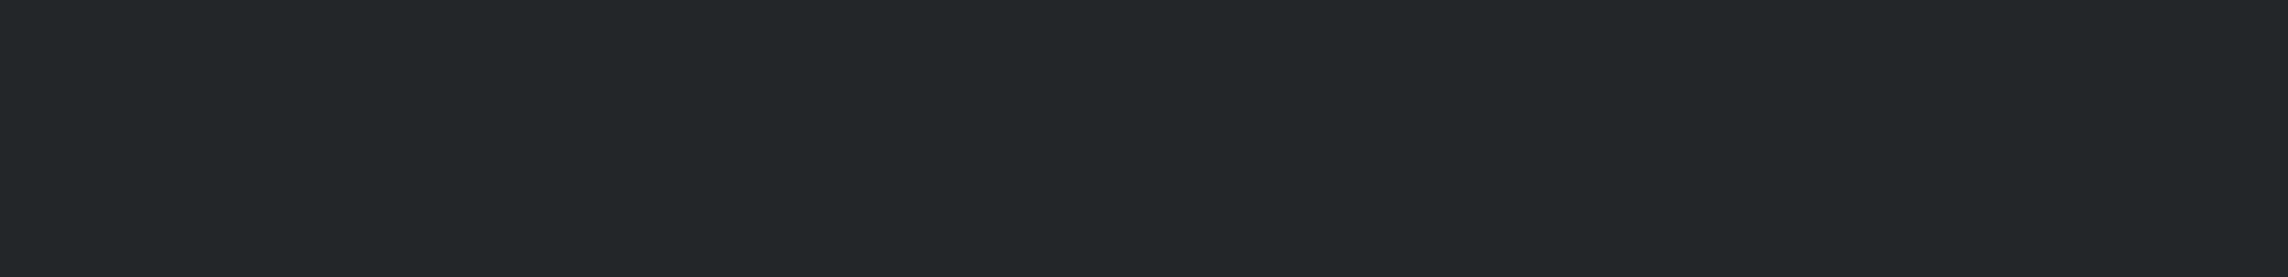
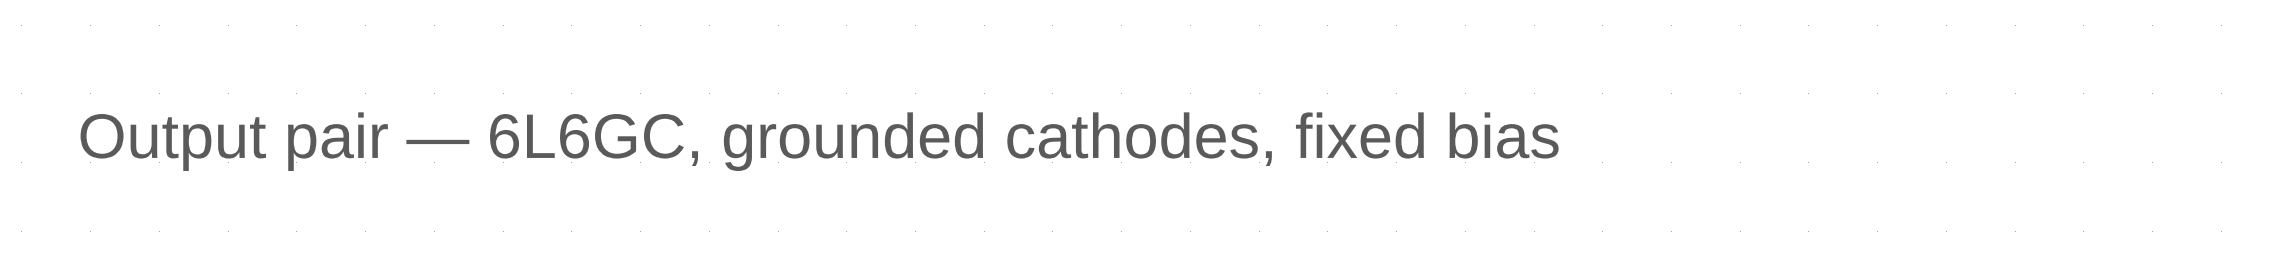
text: none -> Output pair — 6L6GC, grounded cathodes, fixed bias (819, 141)

